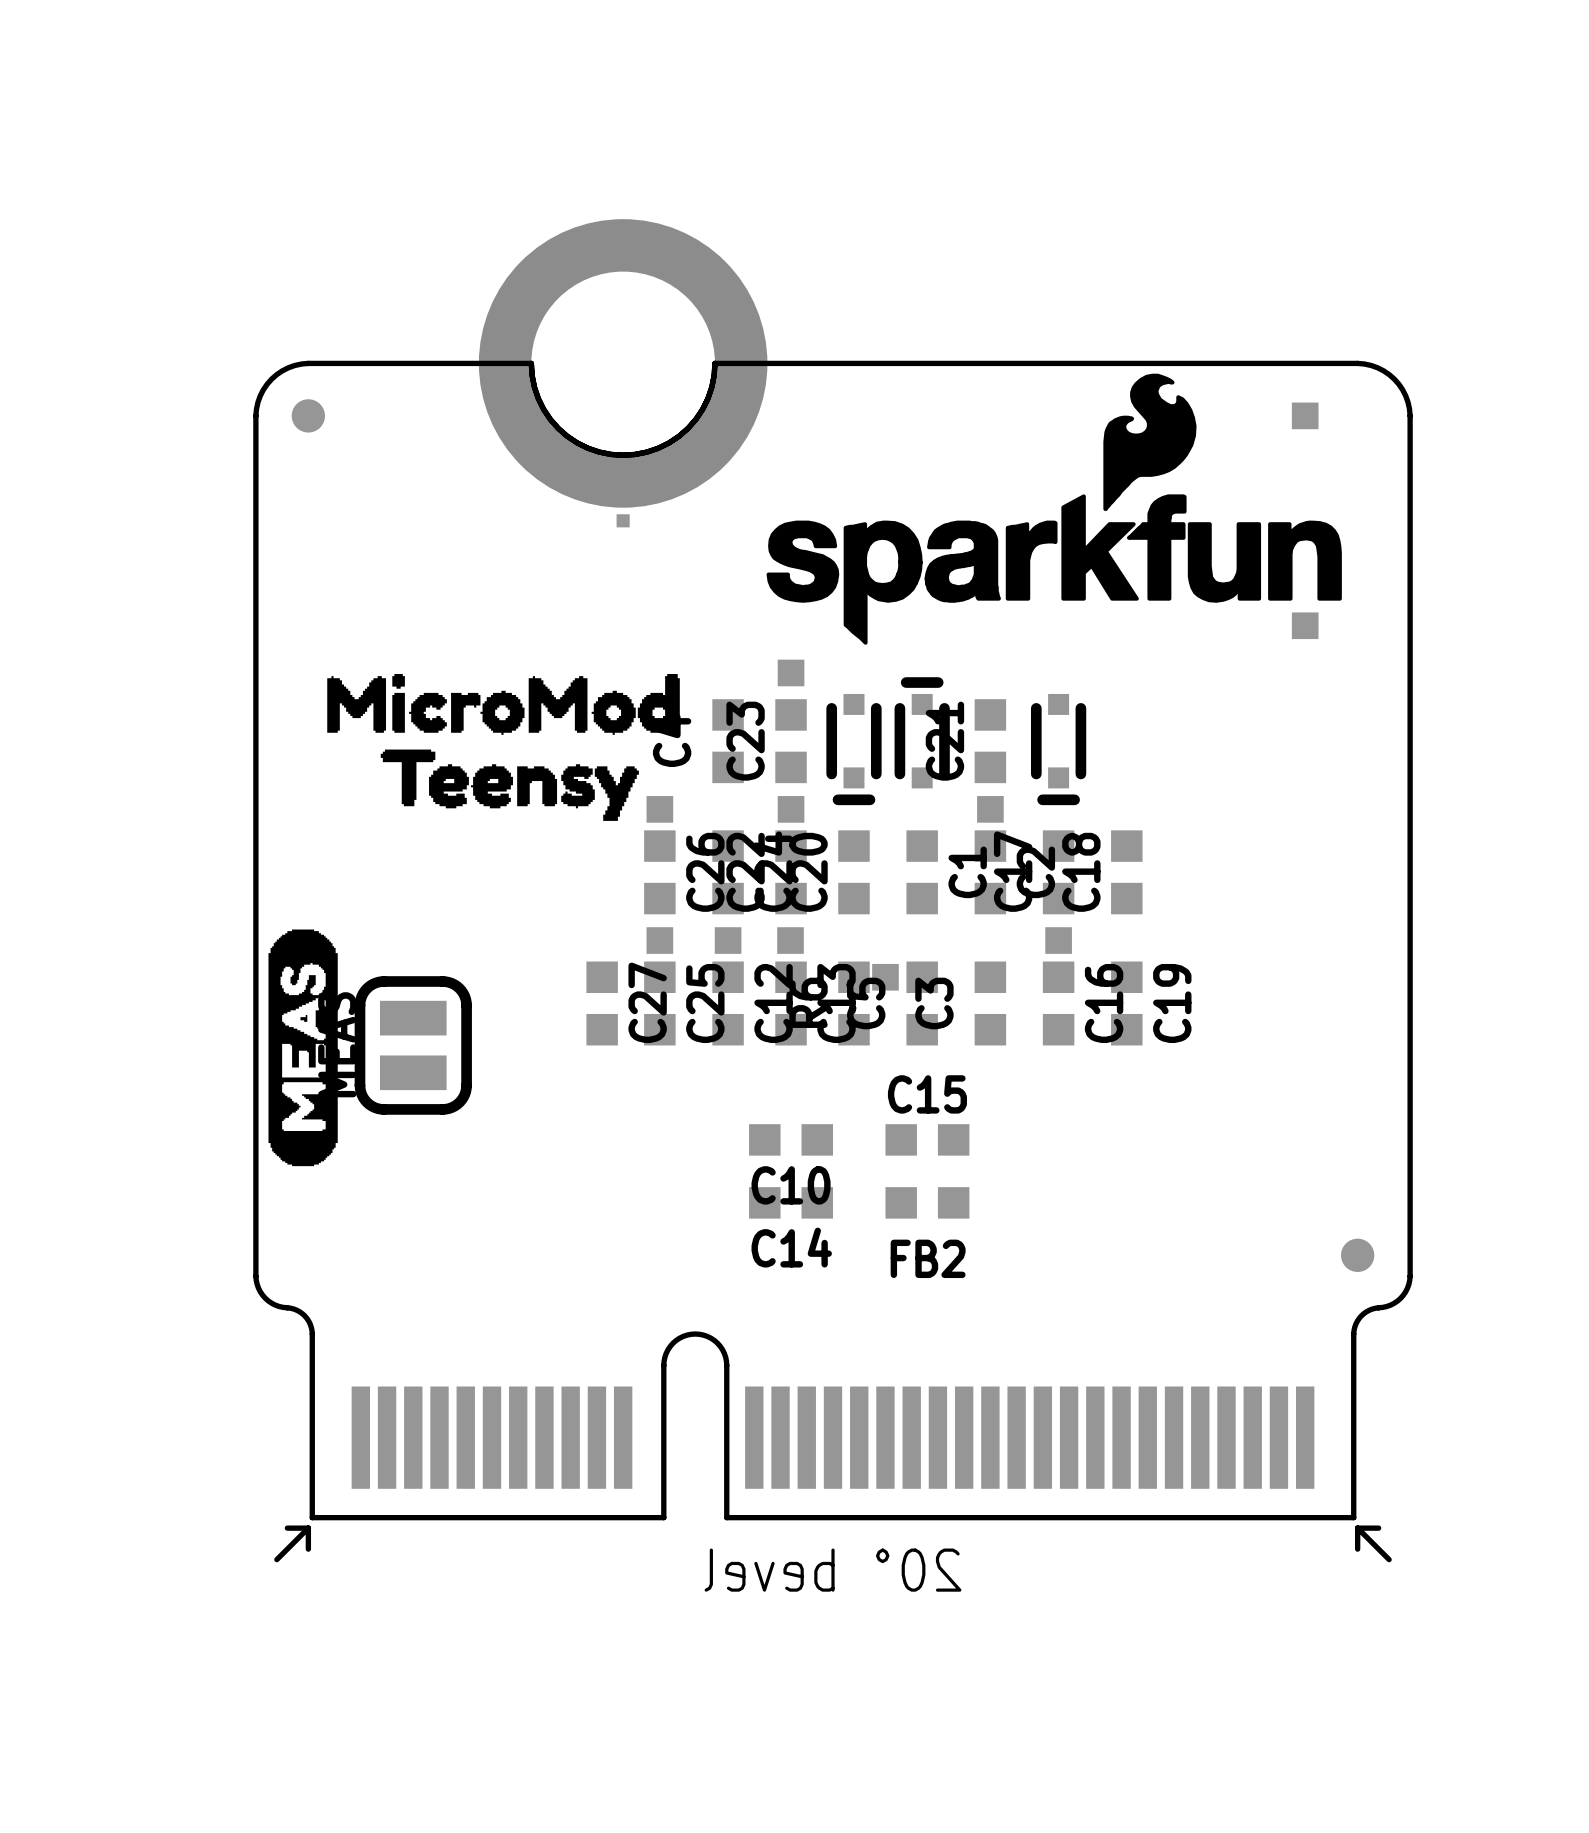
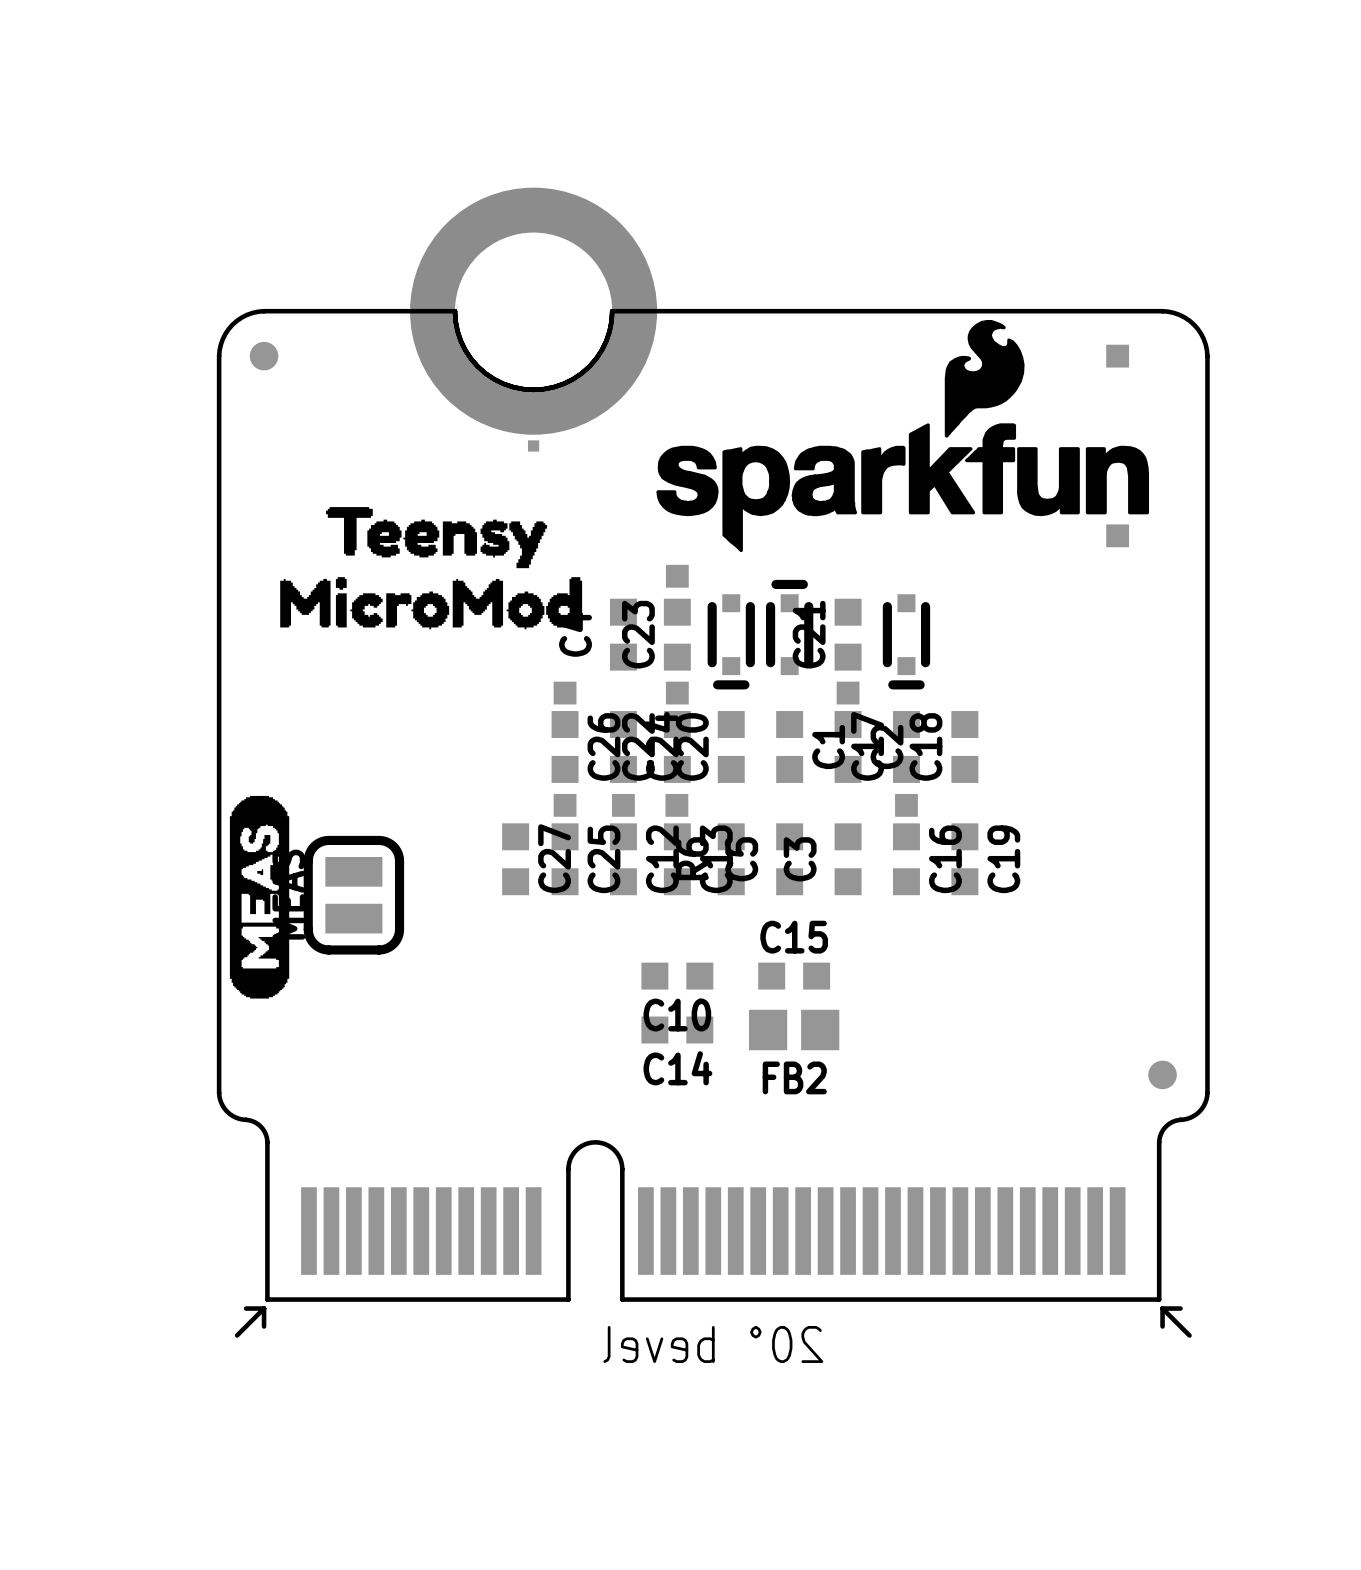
drawing position: (509, 785) -> (436, 537)
part: (885, 977) -> none
FB2 footprint: [885, 1187, 970, 1219] -> [749, 1009, 840, 1051]

